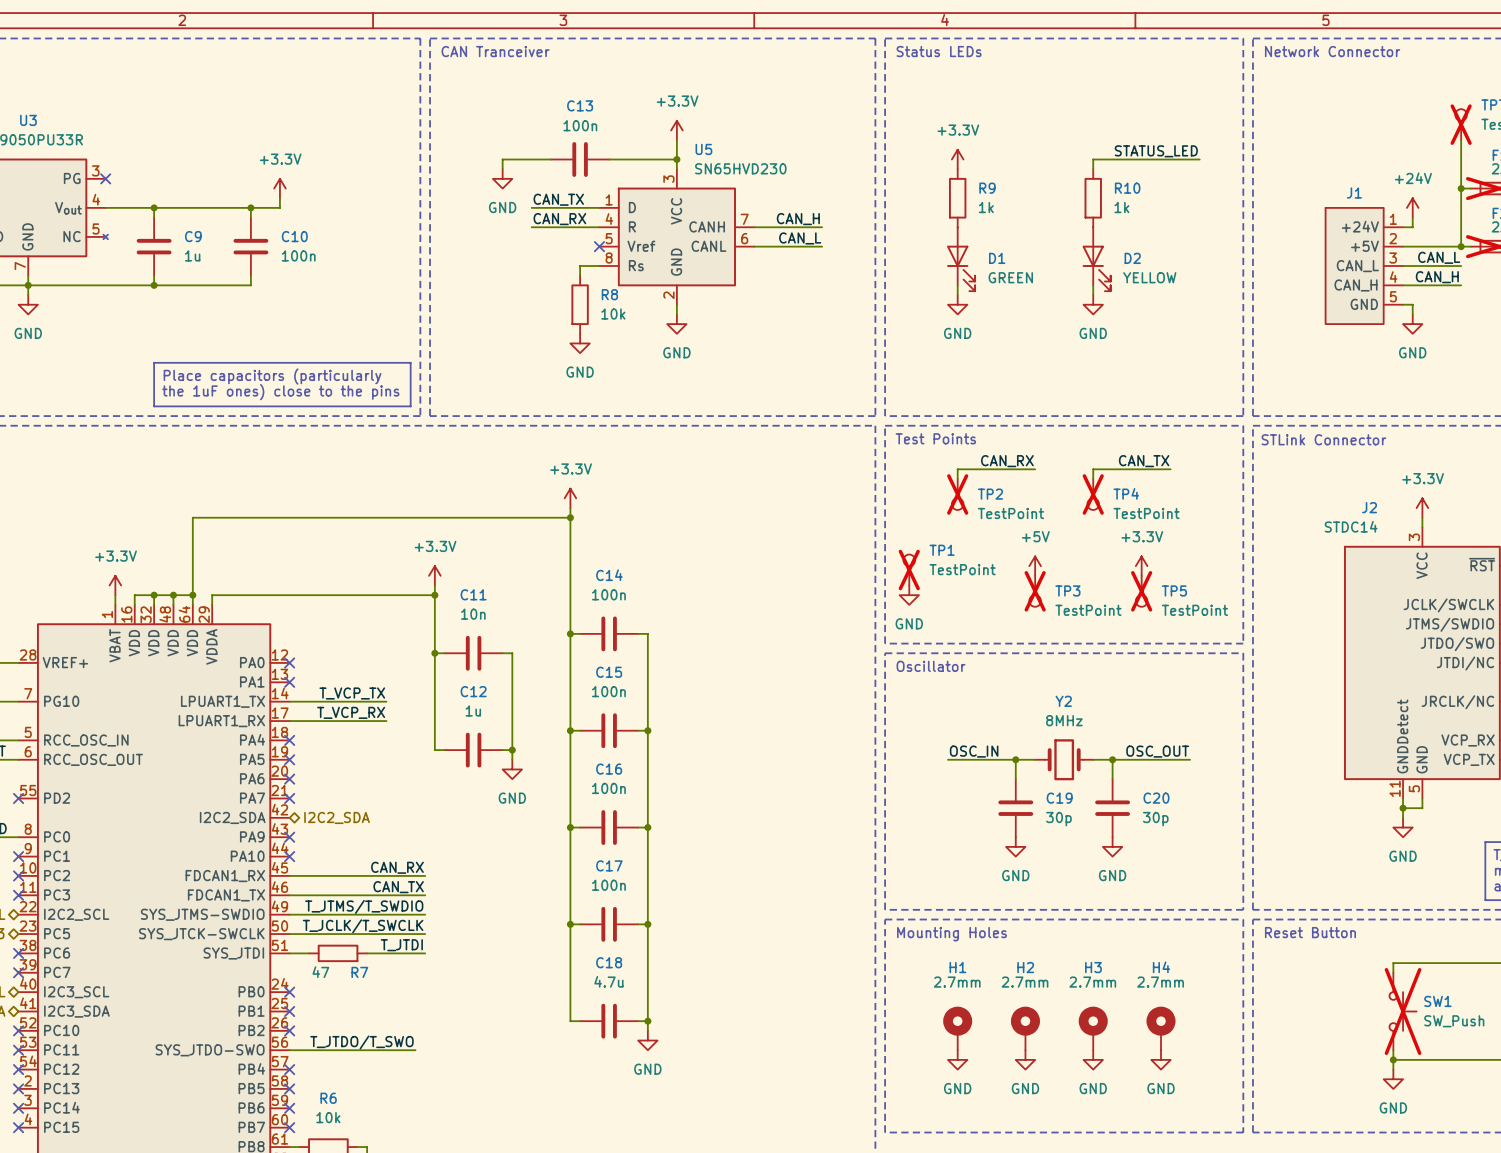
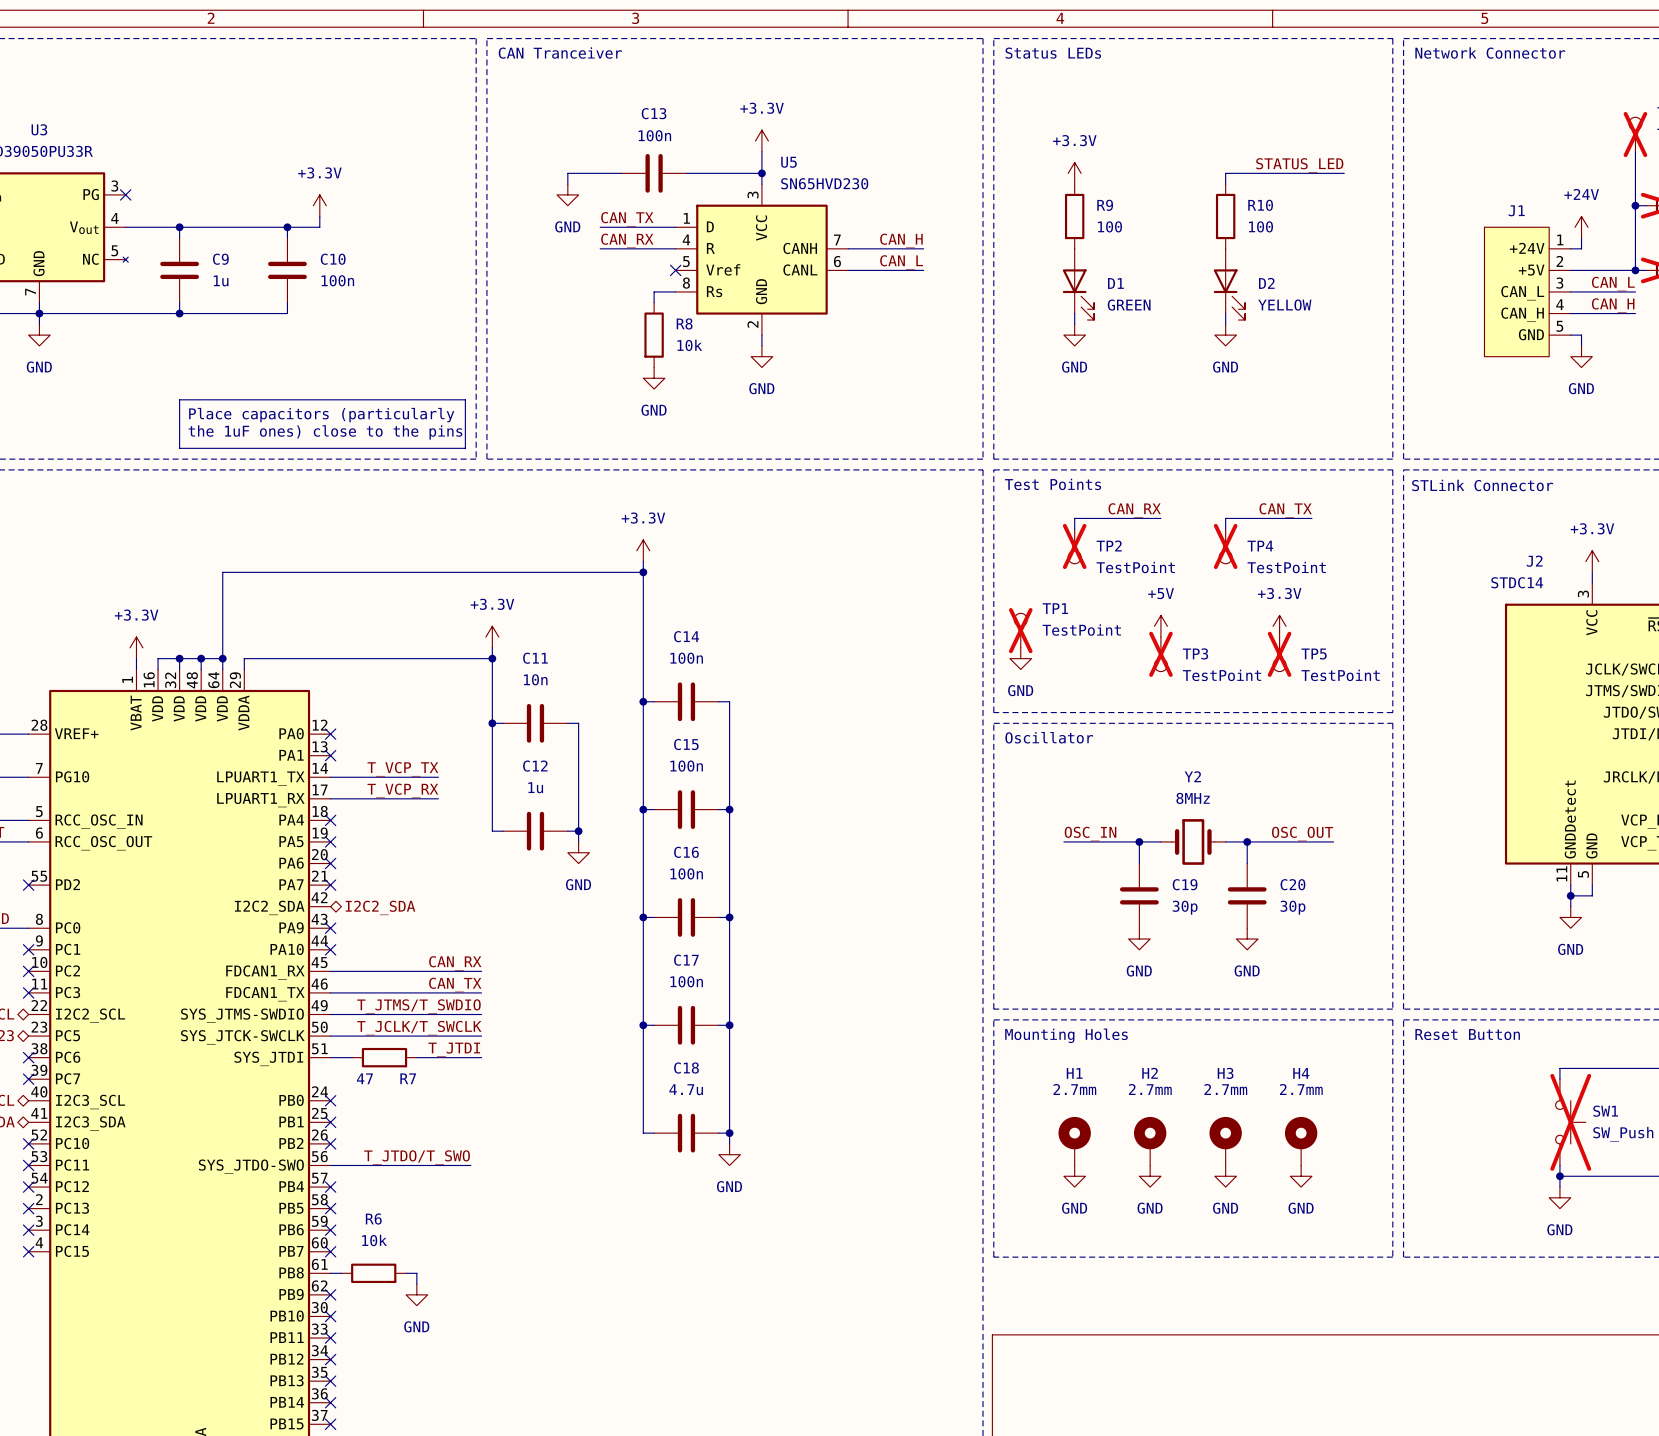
R9 value: 1k (986, 207) -> 100 (1110, 226)
R10 value: 1k (1121, 207) -> 100 (1260, 226)

